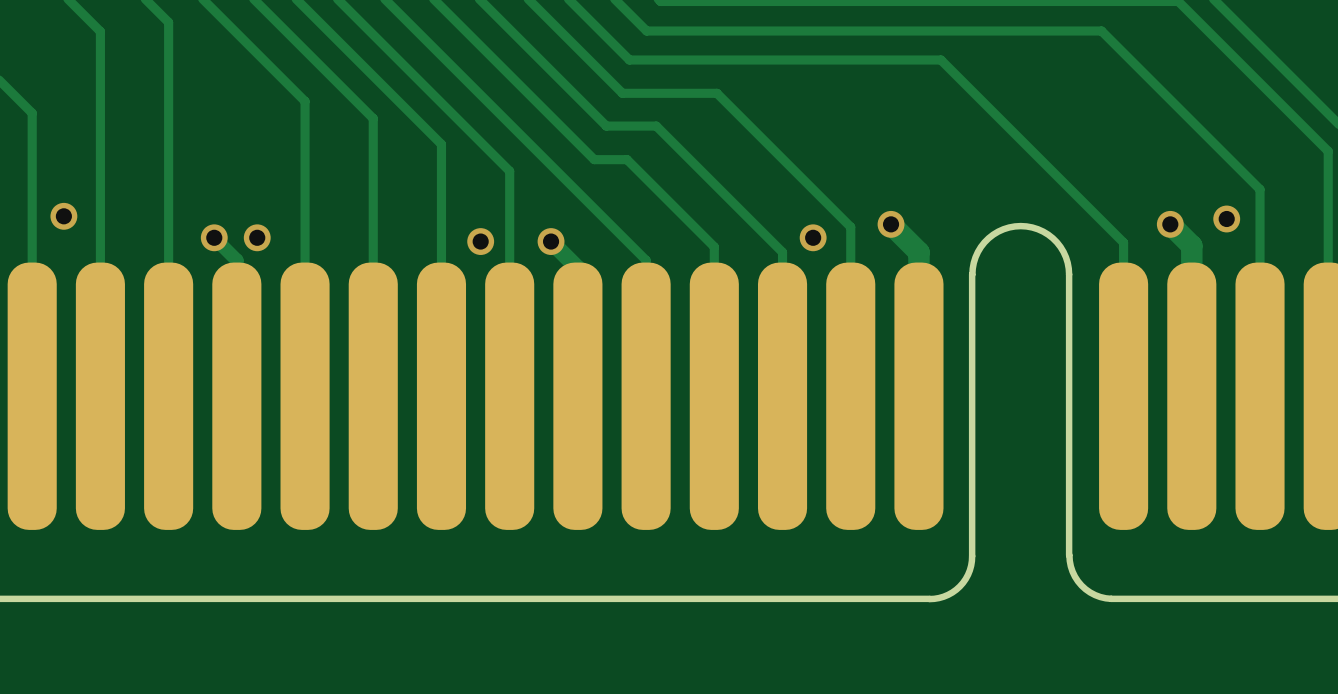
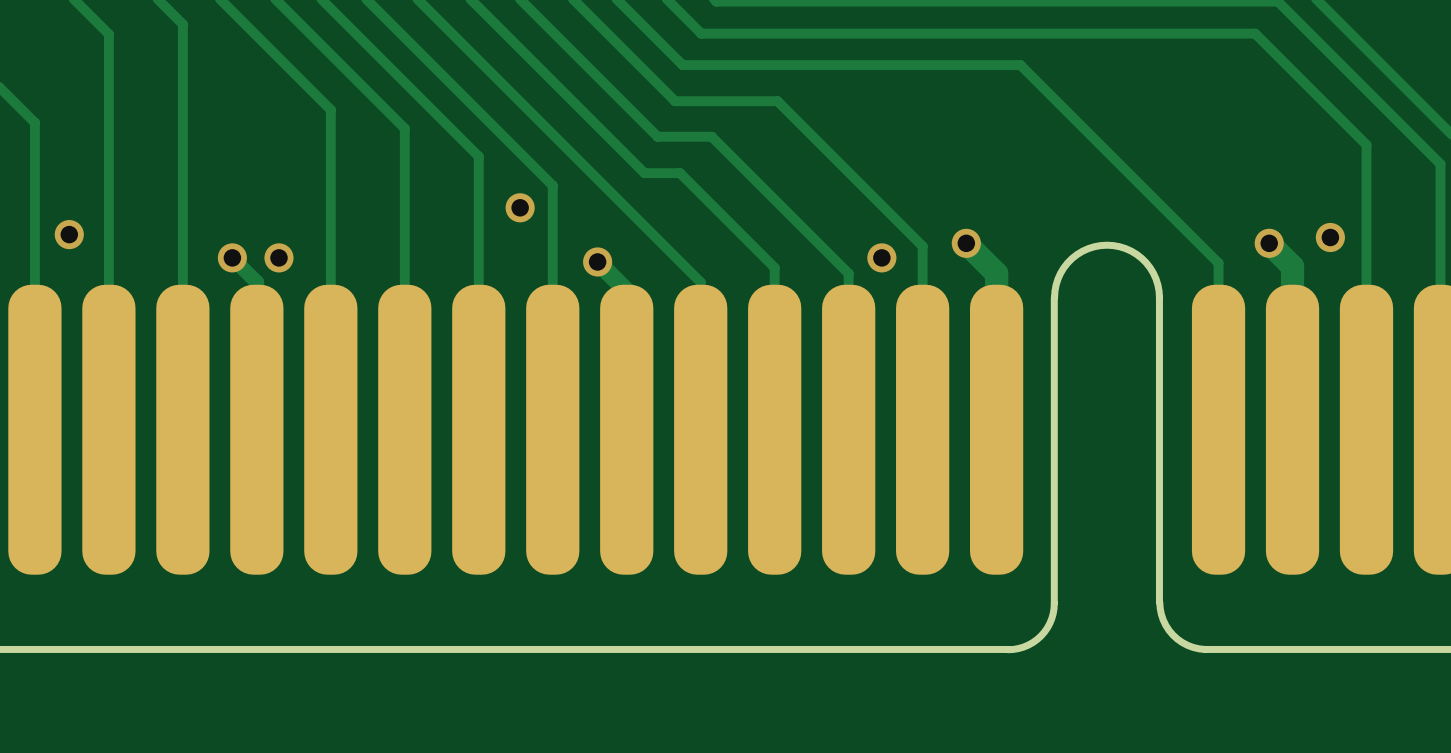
track: (1101, 31) (1260, 189) -> (1194, 33) (1255, 33) (1366, 144) (1366, 205)
via position: (480, 241) -> (520, 207)

